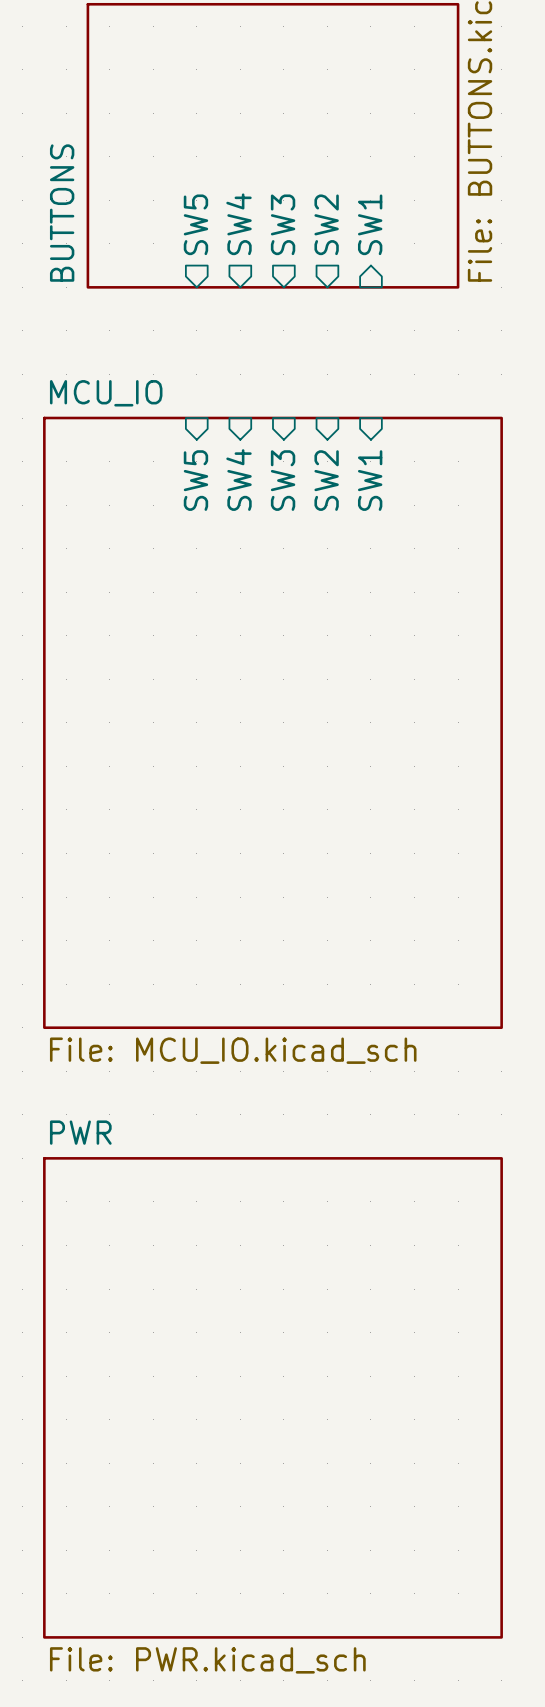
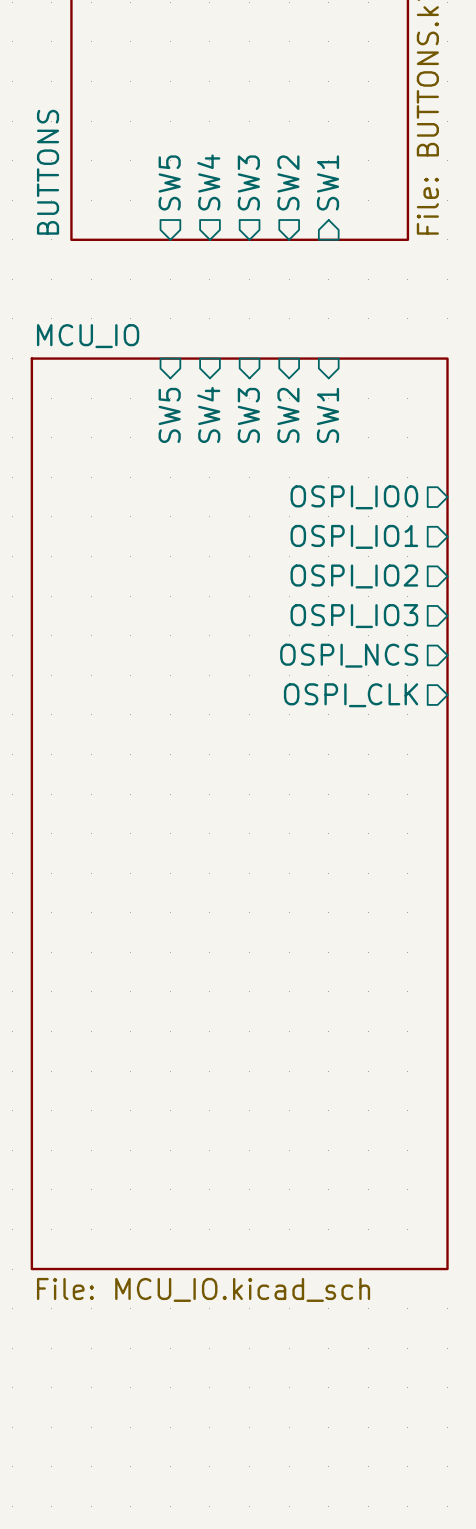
sheet pin: none -> OSPI_IO0 (354, 497)
sheet pin: none -> OSPI_IO1 (354, 536)
sheet pin: none -> OSPI_IO2 (354, 576)
sheet pin: none -> OSPI_IO3 (354, 616)
sheet MCU_IO: File: MCU_IO.kicad_sch (272, 722) -> none
sheet pin: none -> OSPI_NCS (349, 655)
sheet pin: none -> OSPI_CLK (351, 695)
sheet MCU_IO: none -> File: MCU_IO.kicad_sch (239, 813)
sheet PWR: File: PWR.kicad_sch (272, 1397) -> none

